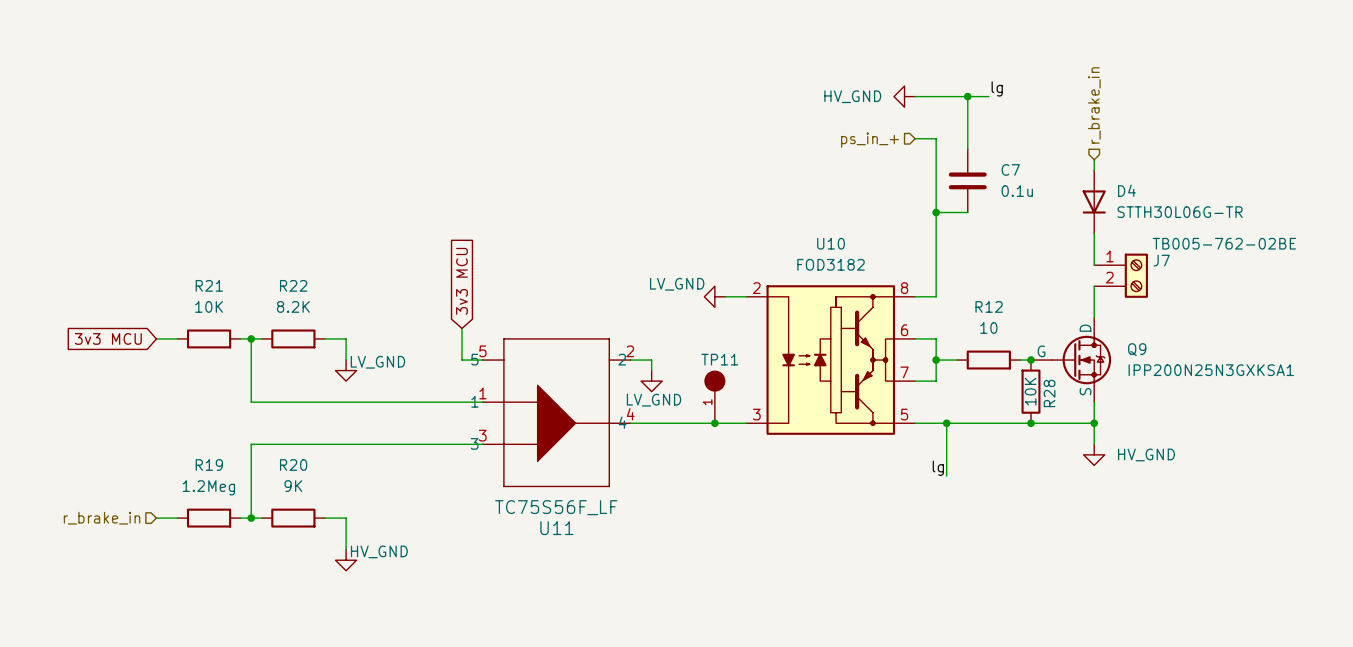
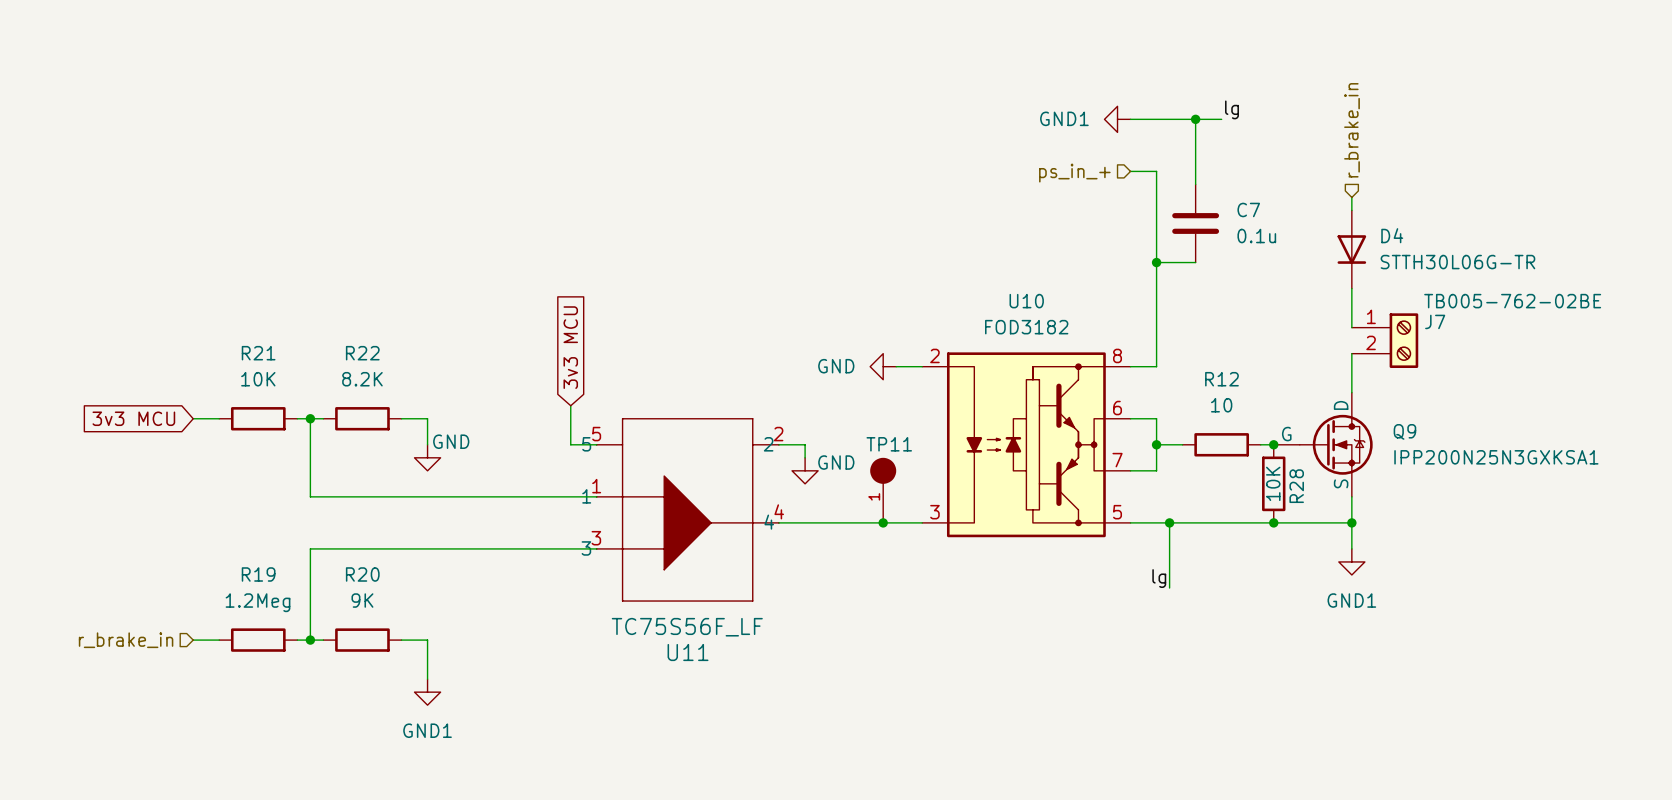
power symbol: HV_GND (904, 96) -> GND1 (1117, 119)
power symbol: LV_GND (714, 296) -> GND (883, 366)
power symbol: LV_GND (346, 370) -> GND (427, 457)
power symbol: LV_GND (651, 381) -> GND (805, 470)
power symbol: HV_GND (1094, 454) -> GND1 (1351, 561)
power symbol: HV_GND (346, 560) -> GND1 (427, 692)

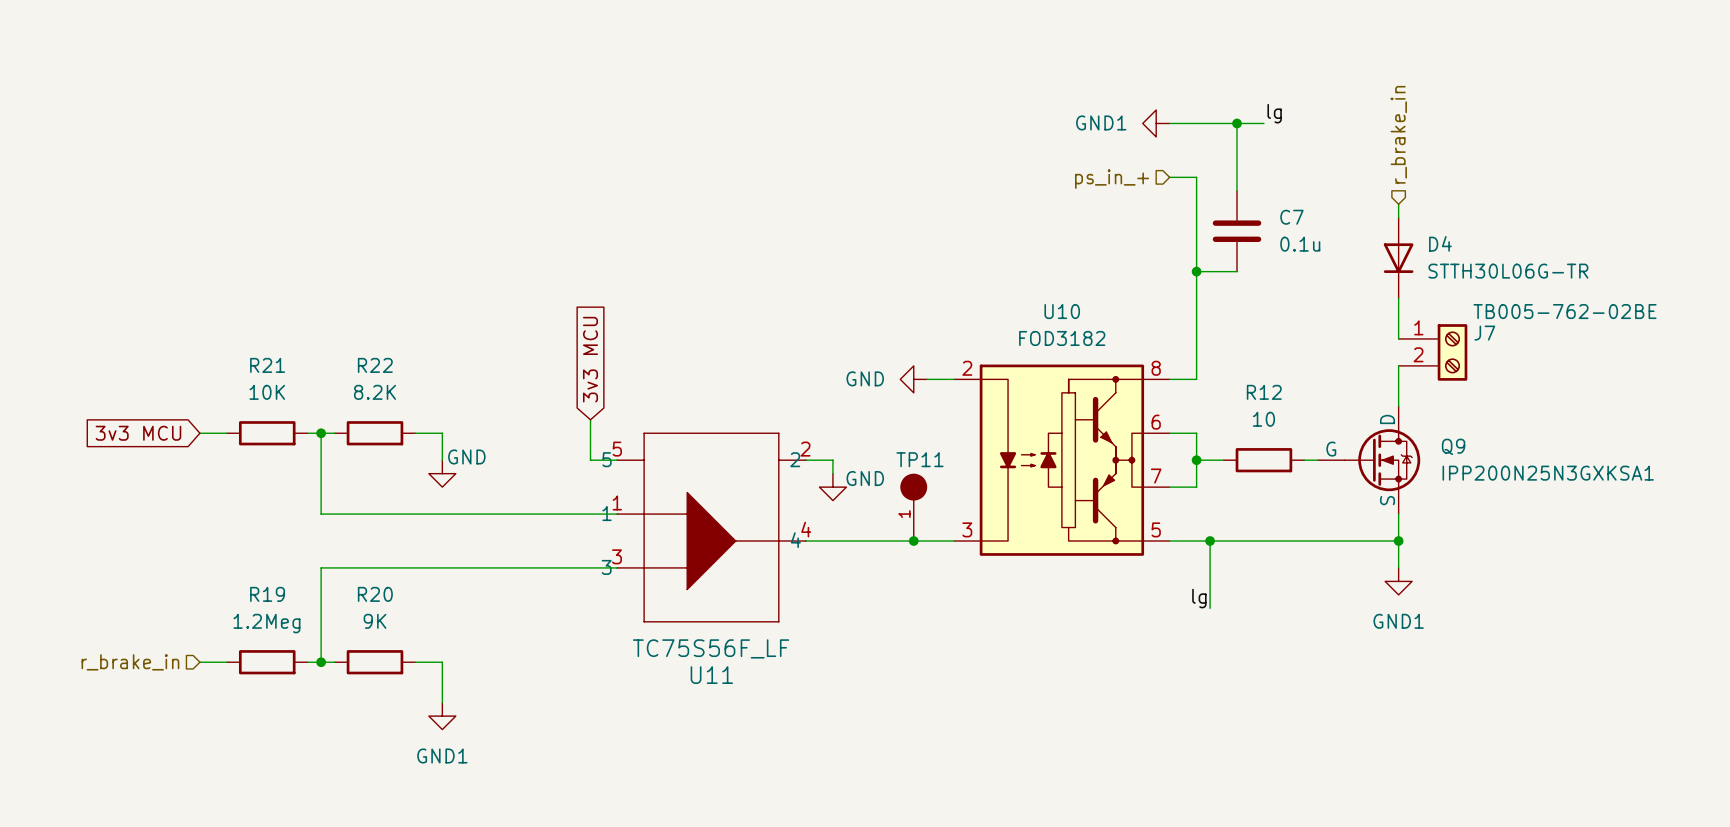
junction: (1273, 444) -> none
R28: 10K (1273, 483) -> none
junction: (1273, 522) -> none

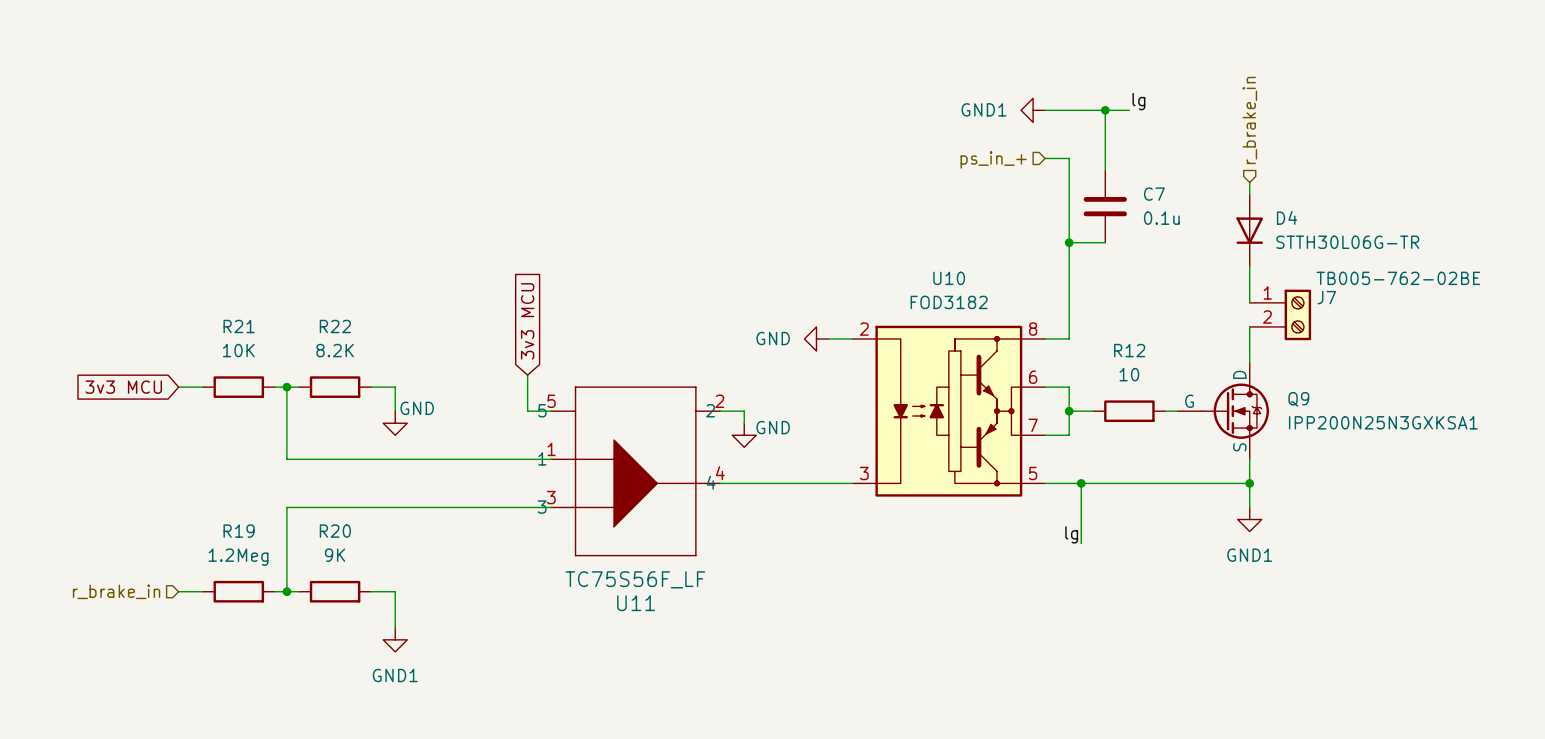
TP11: (913, 507) -> none
junction: (913, 541) -> none

